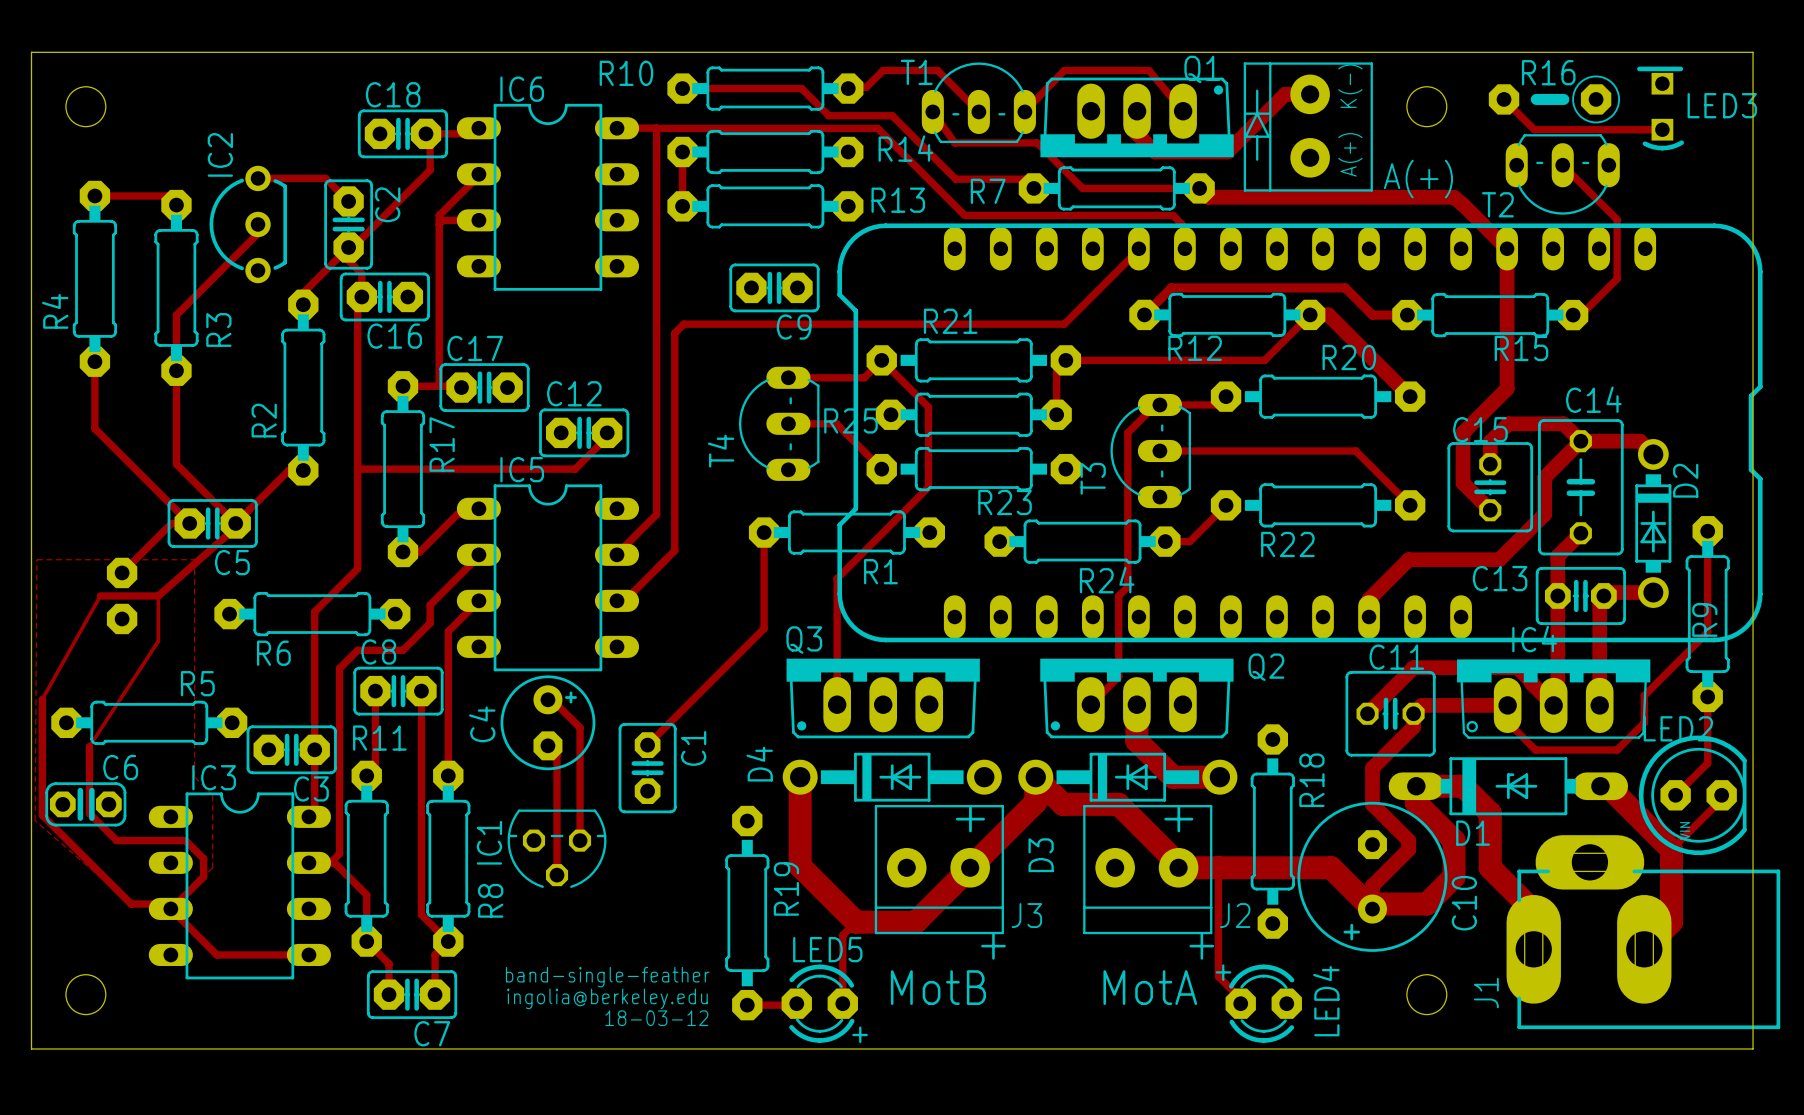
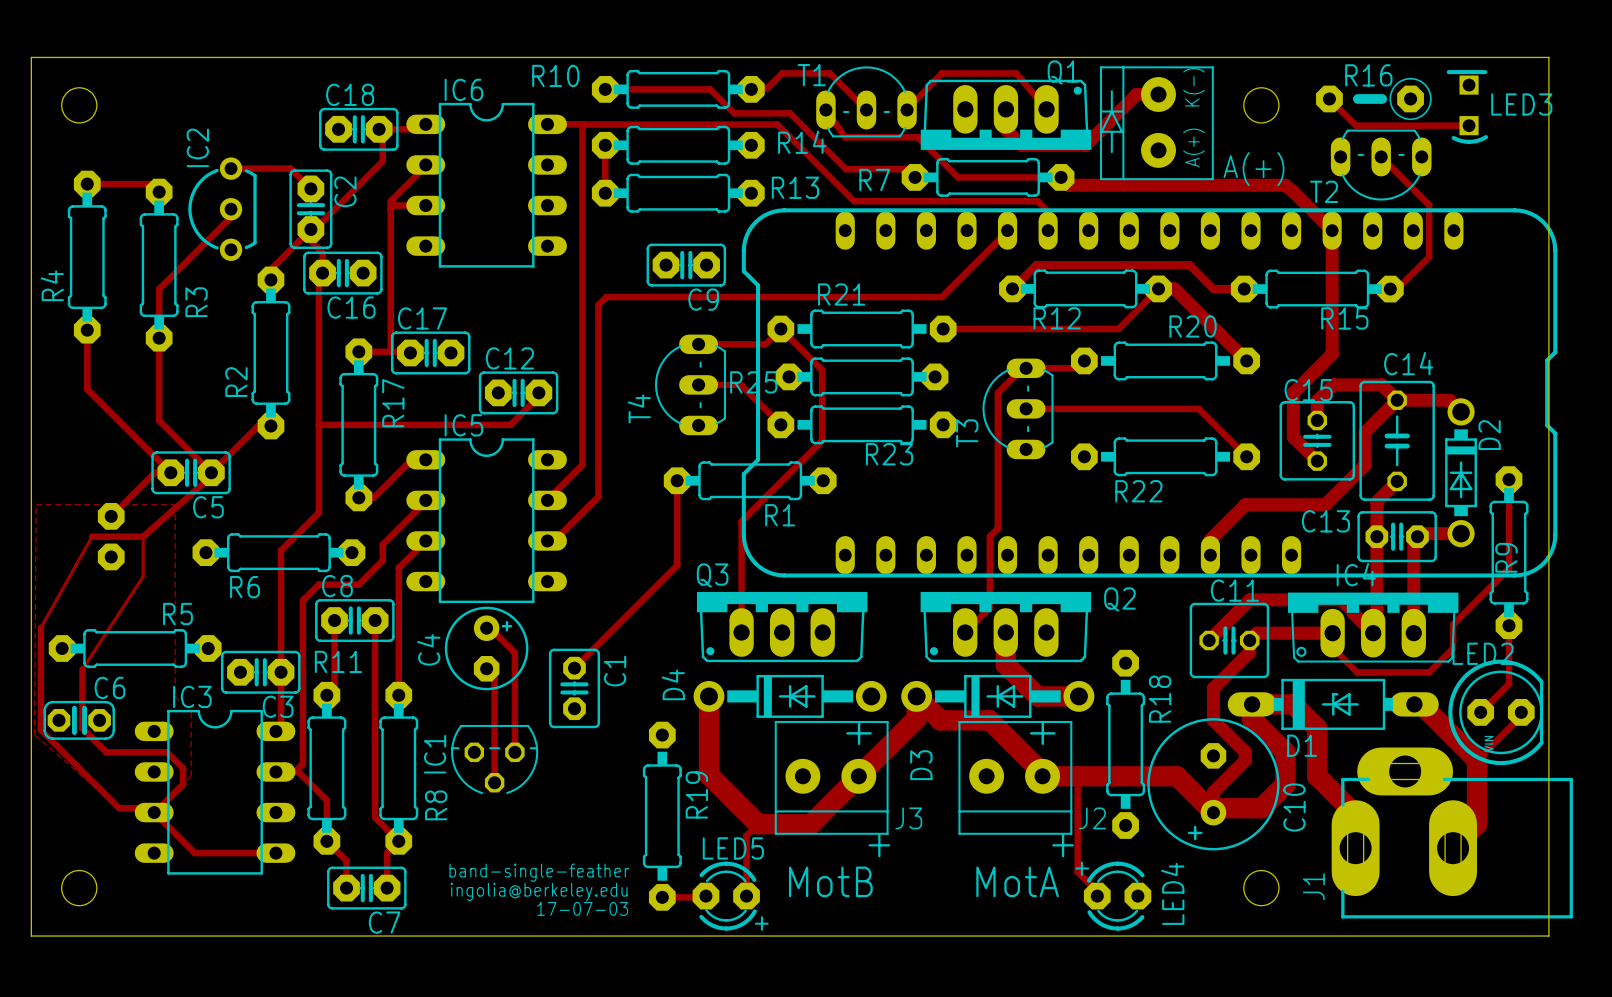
track: (1065, 360) (1056, 369) (1056, 414) -> none
track: (1226, 505) (1189, 541) (1165, 541) -> none
R24: (1082, 541) -> none
text: 18-03-12 (656, 1018) -> 17-07-03 (582, 908)

